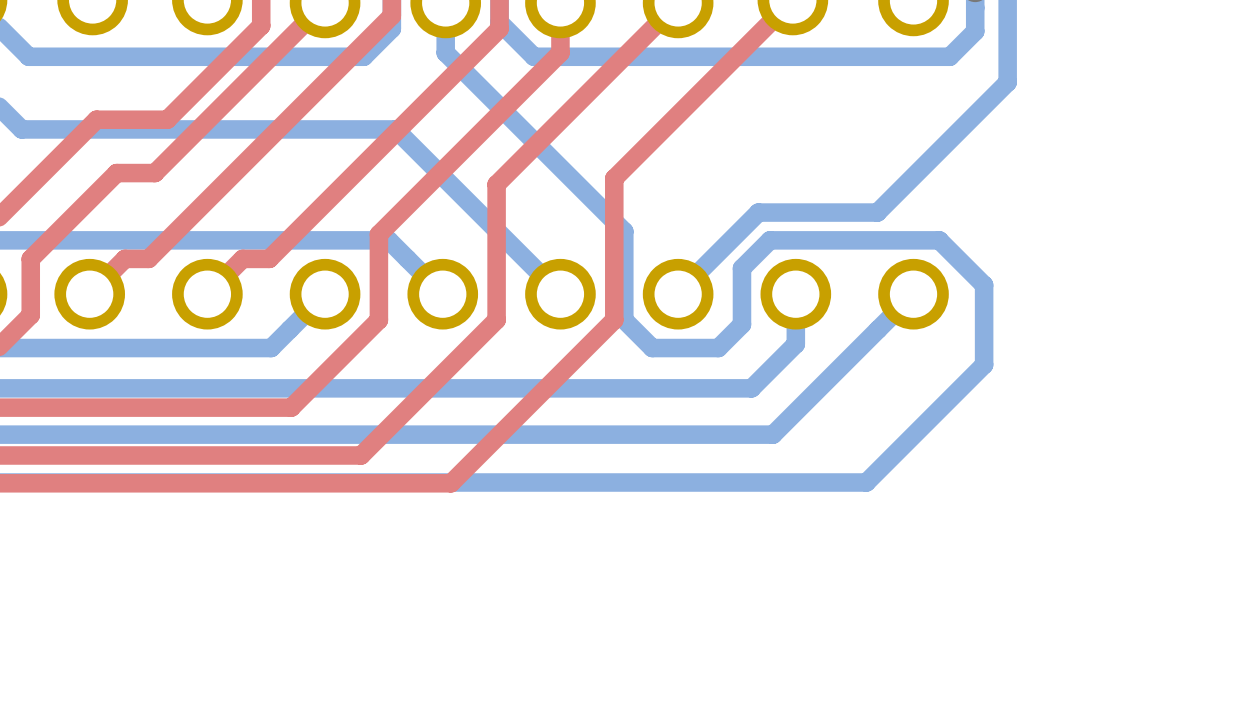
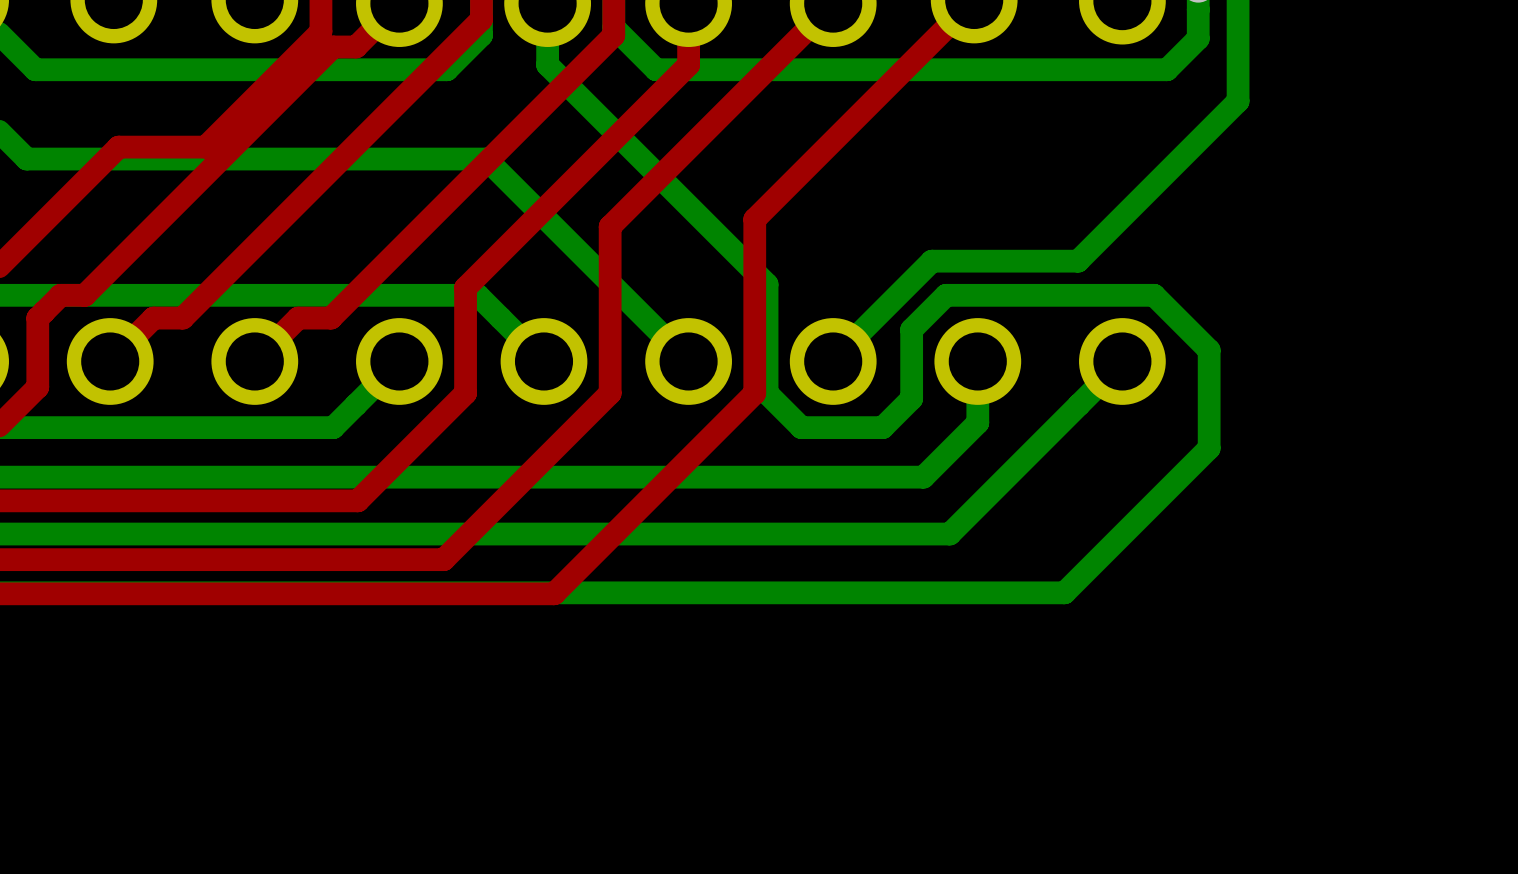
top track: (289, 38) (154, 173) (116, 173) (49, 240) -> (356, 46) (333, 46) (84, 295) (60, 295)

